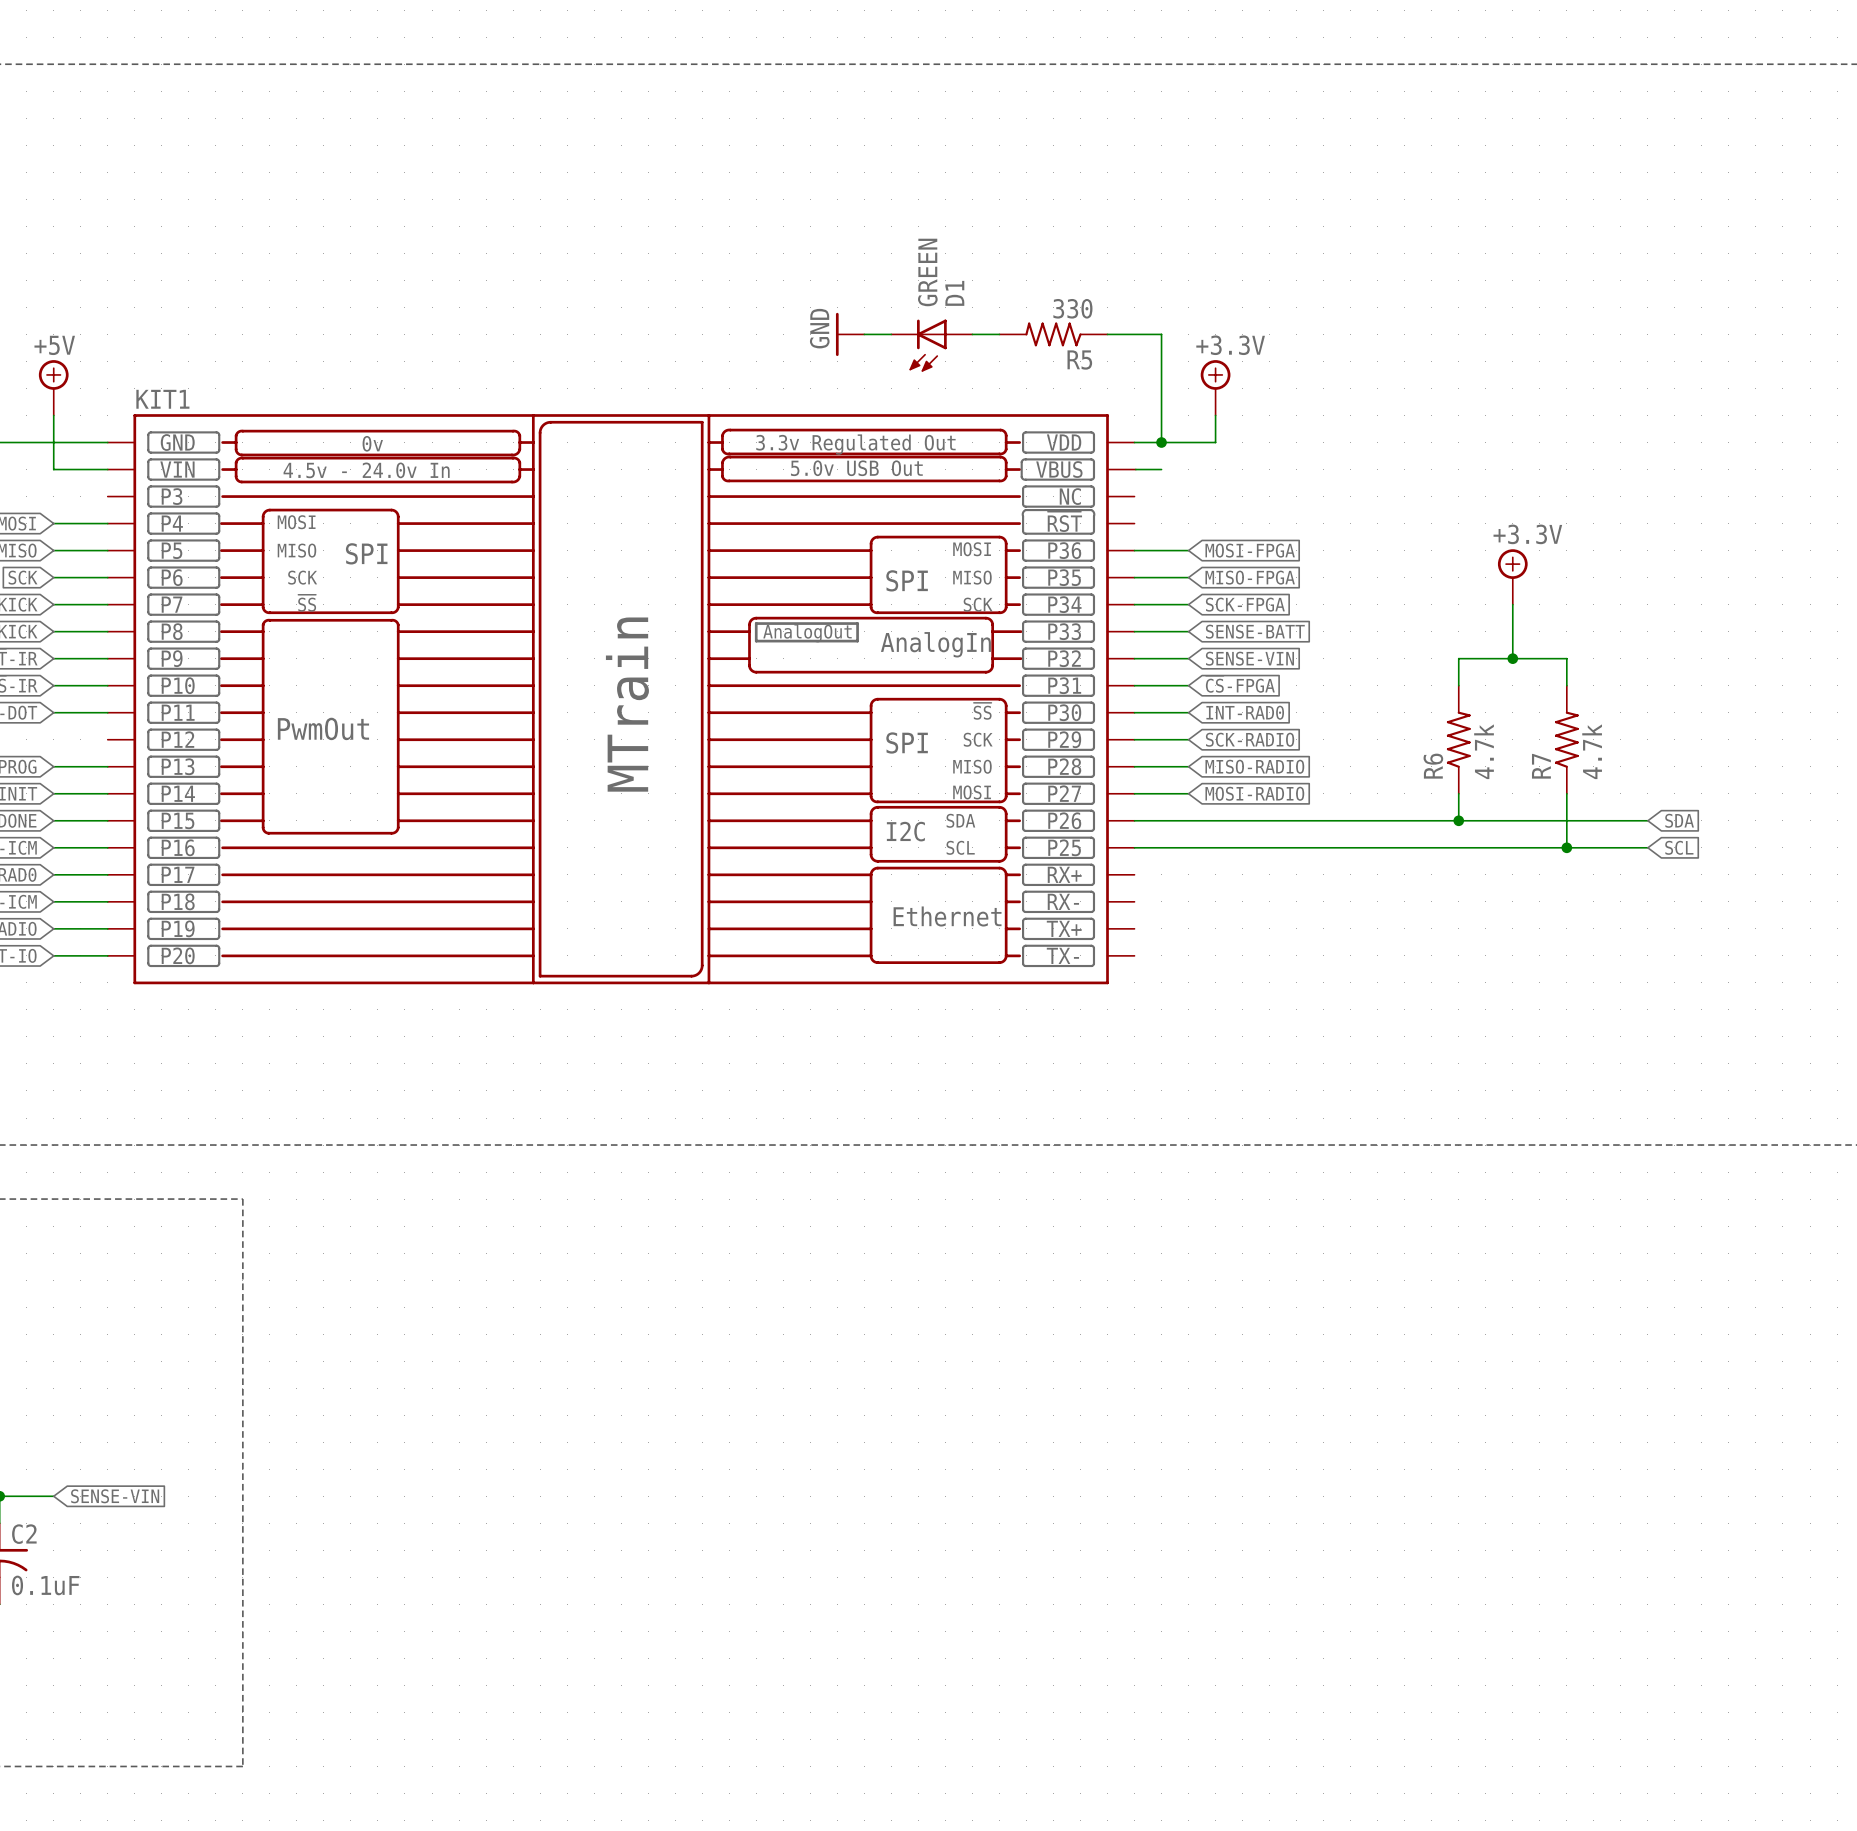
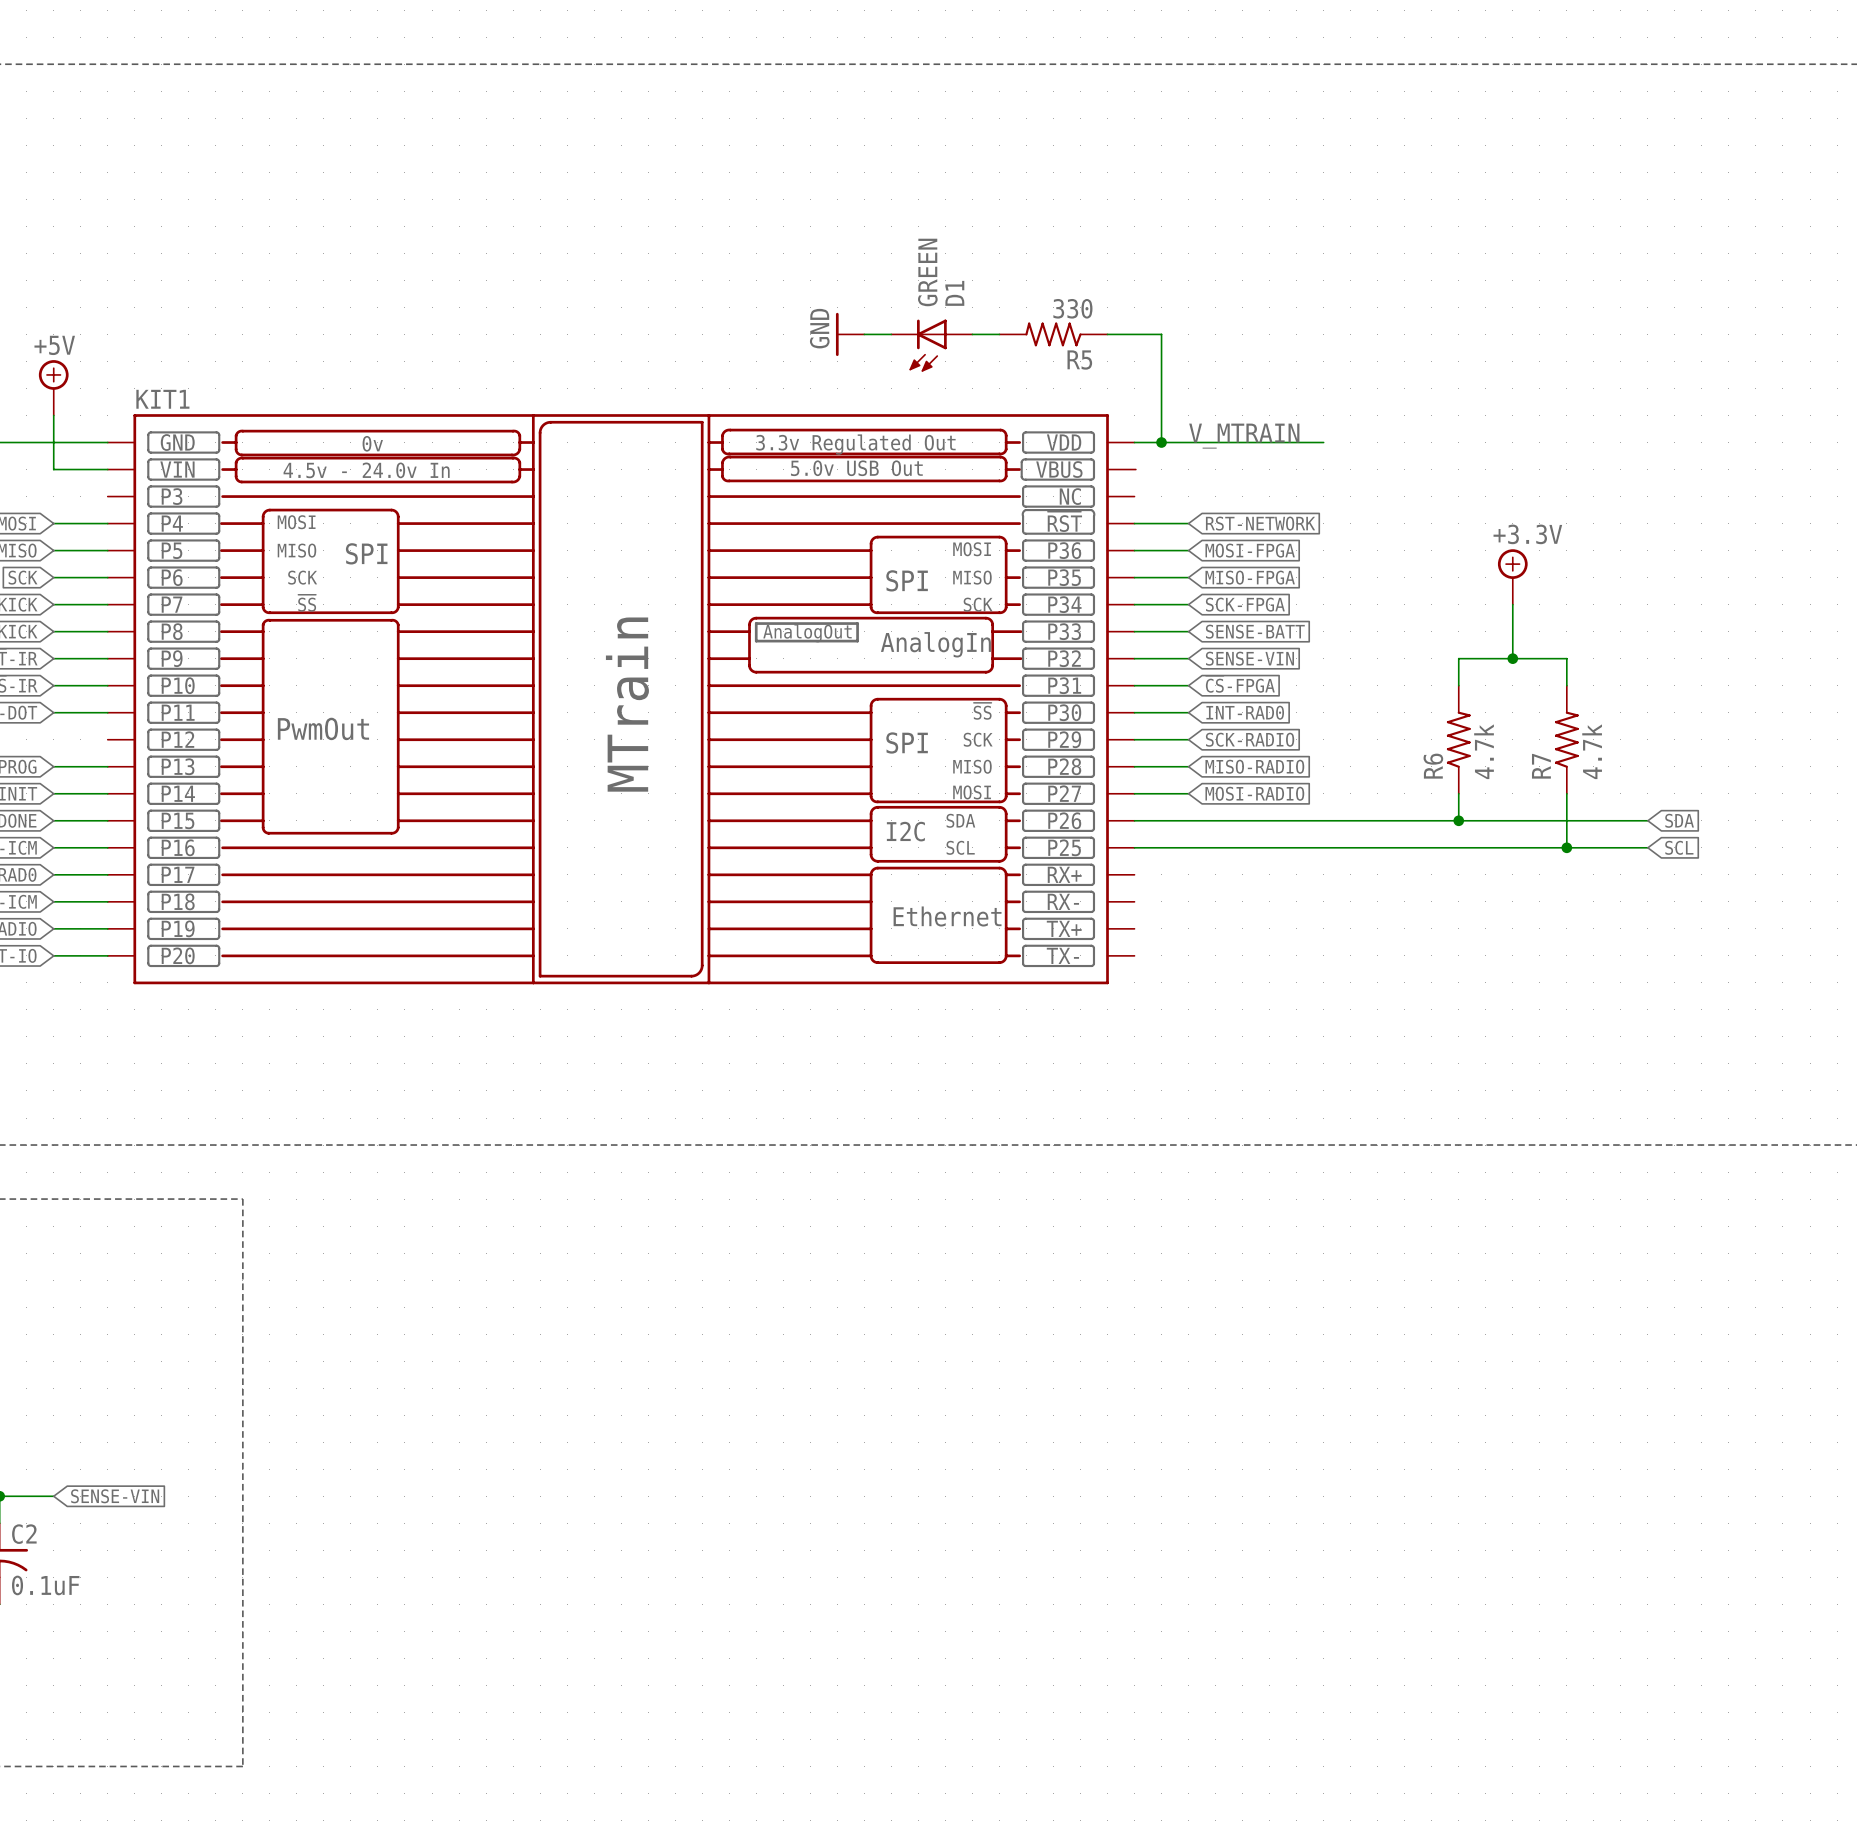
power symbol: +3.3V (1215, 387) -> none
wire: (1215, 415) (1215, 442) -> (1323, 442) (1215, 442)
label: none -> V_MTRAIN (1244, 436)
wire: (1135, 469) (1161, 469) -> none
wire: none -> (1134, 523) (1188, 523)
global label: none -> RST-NETWORK (1260, 523)

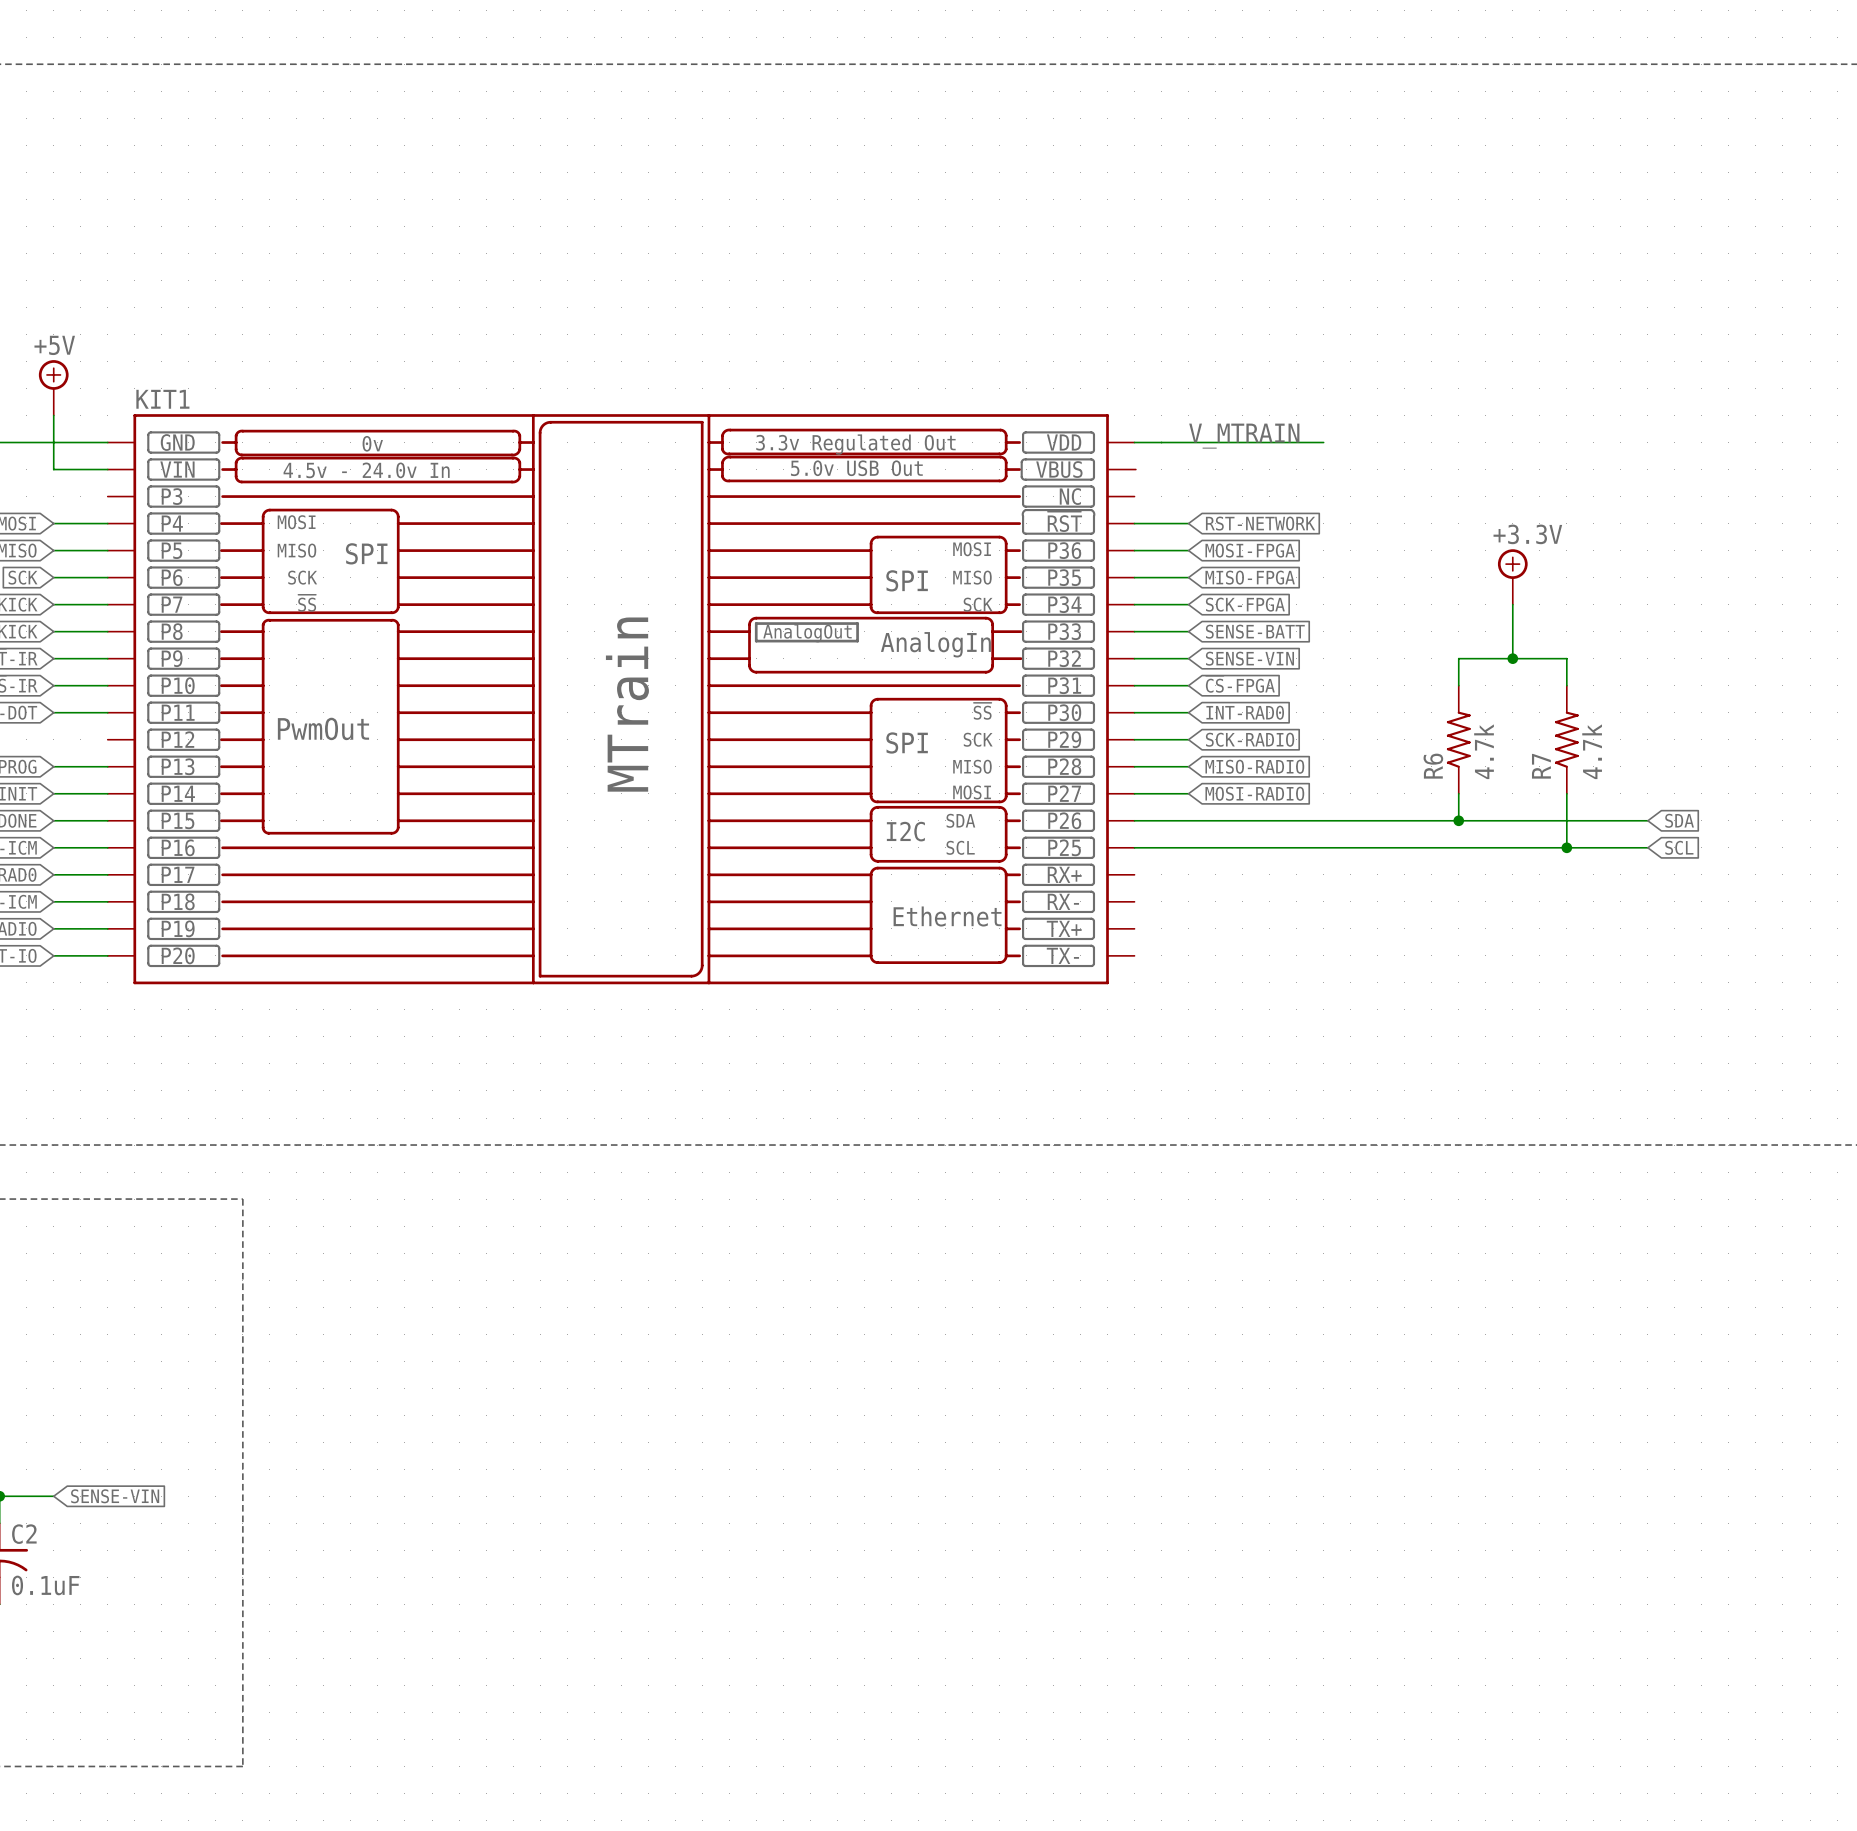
power symbol: GND (850, 334) -> none
wire: (864, 334) (891, 334) -> none
wire: (972, 334) (999, 334) -> none
R5: 330 (1053, 334) -> none
wire: (1107, 334) (1161, 334) (1161, 442) -> none
D1: GREEN (931, 345) -> none
junction: (1161, 442) -> none

